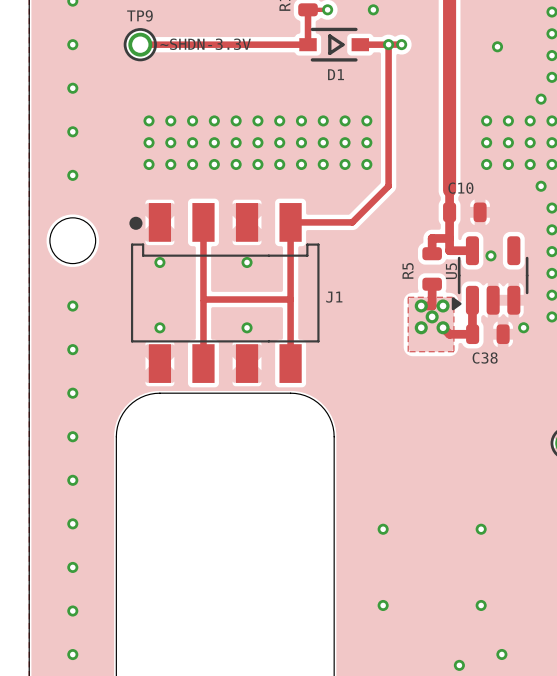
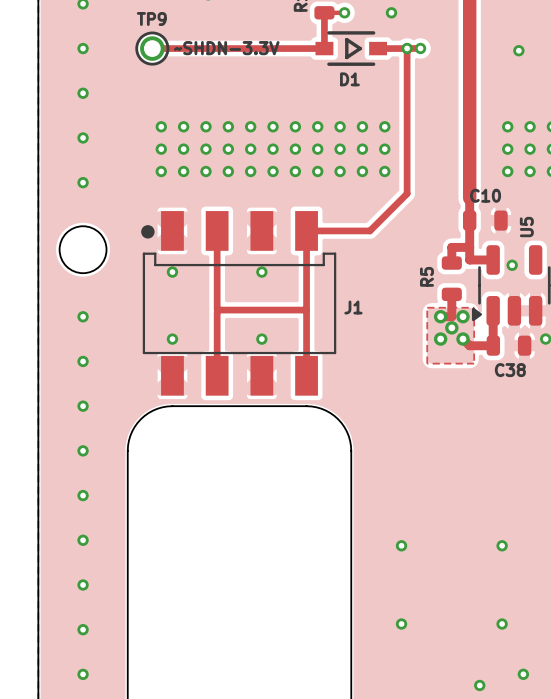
U5 name position: U5 (451, 271) -> U5 (526, 227)

